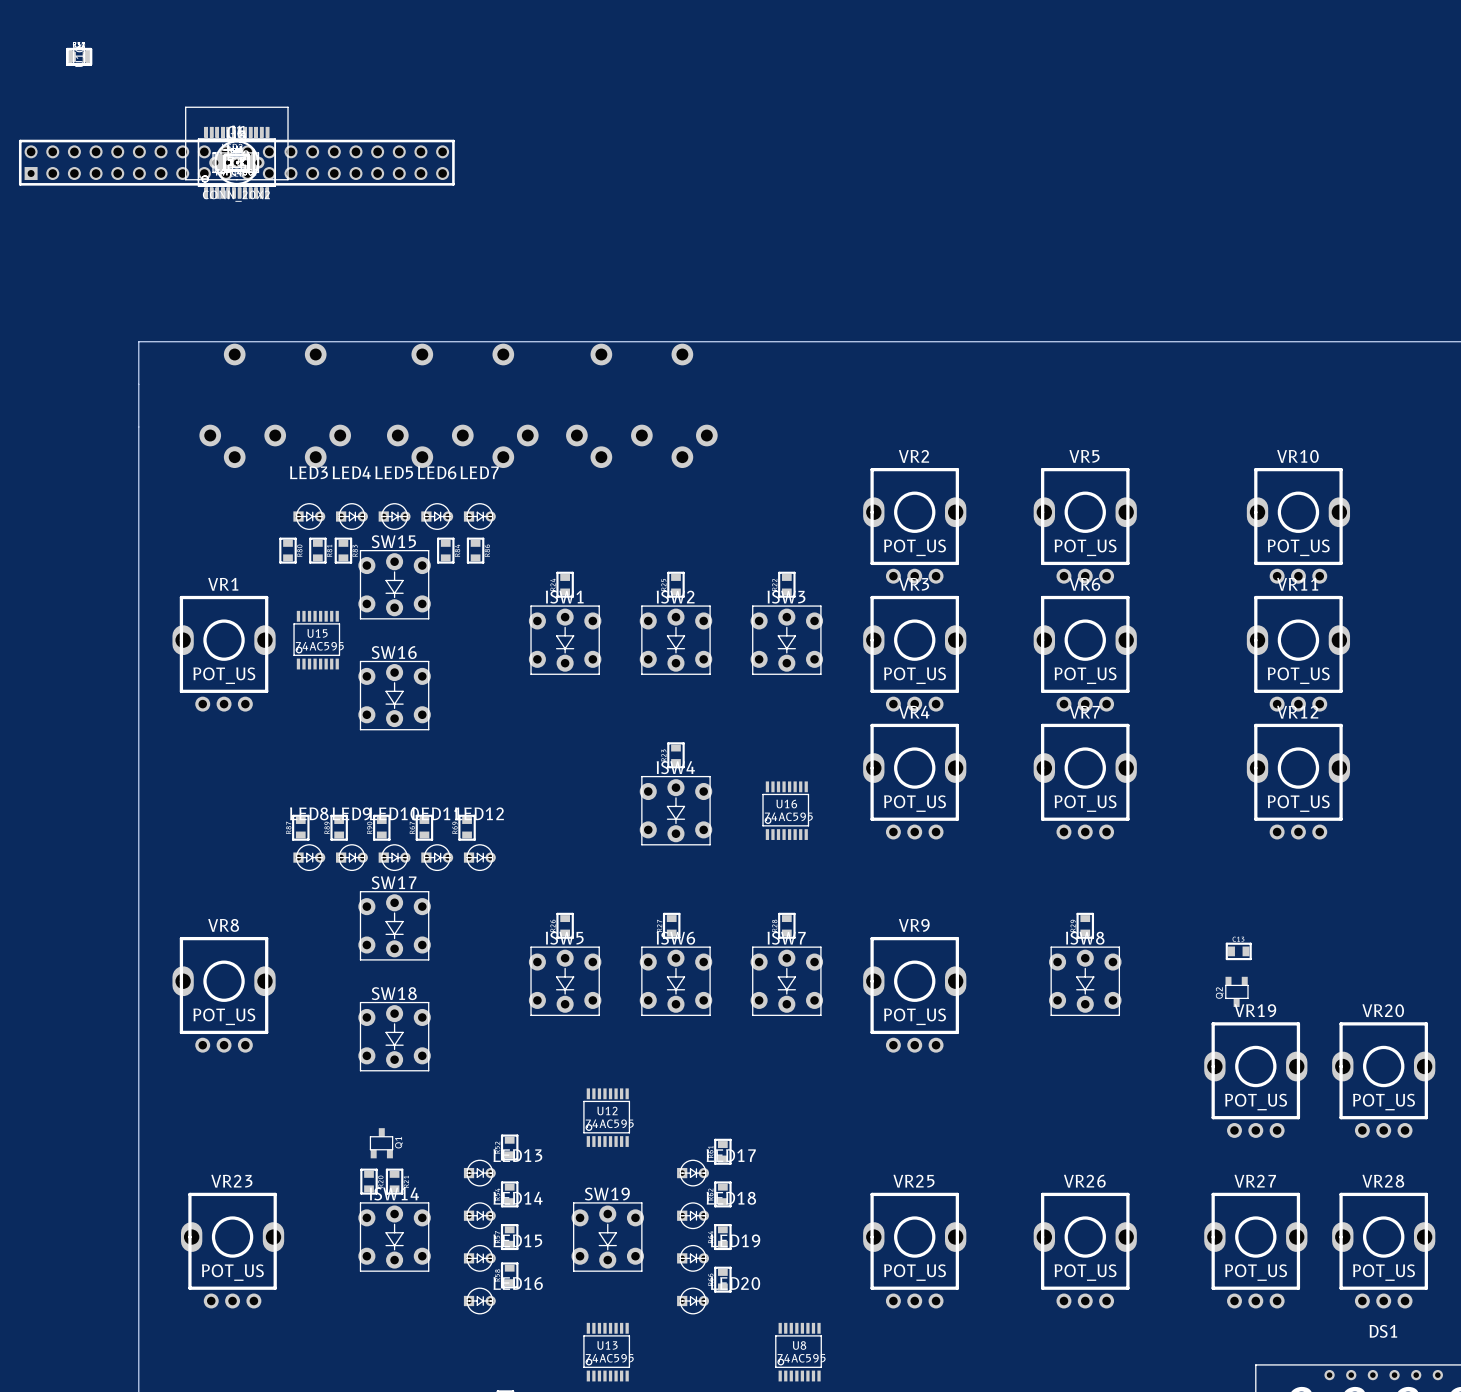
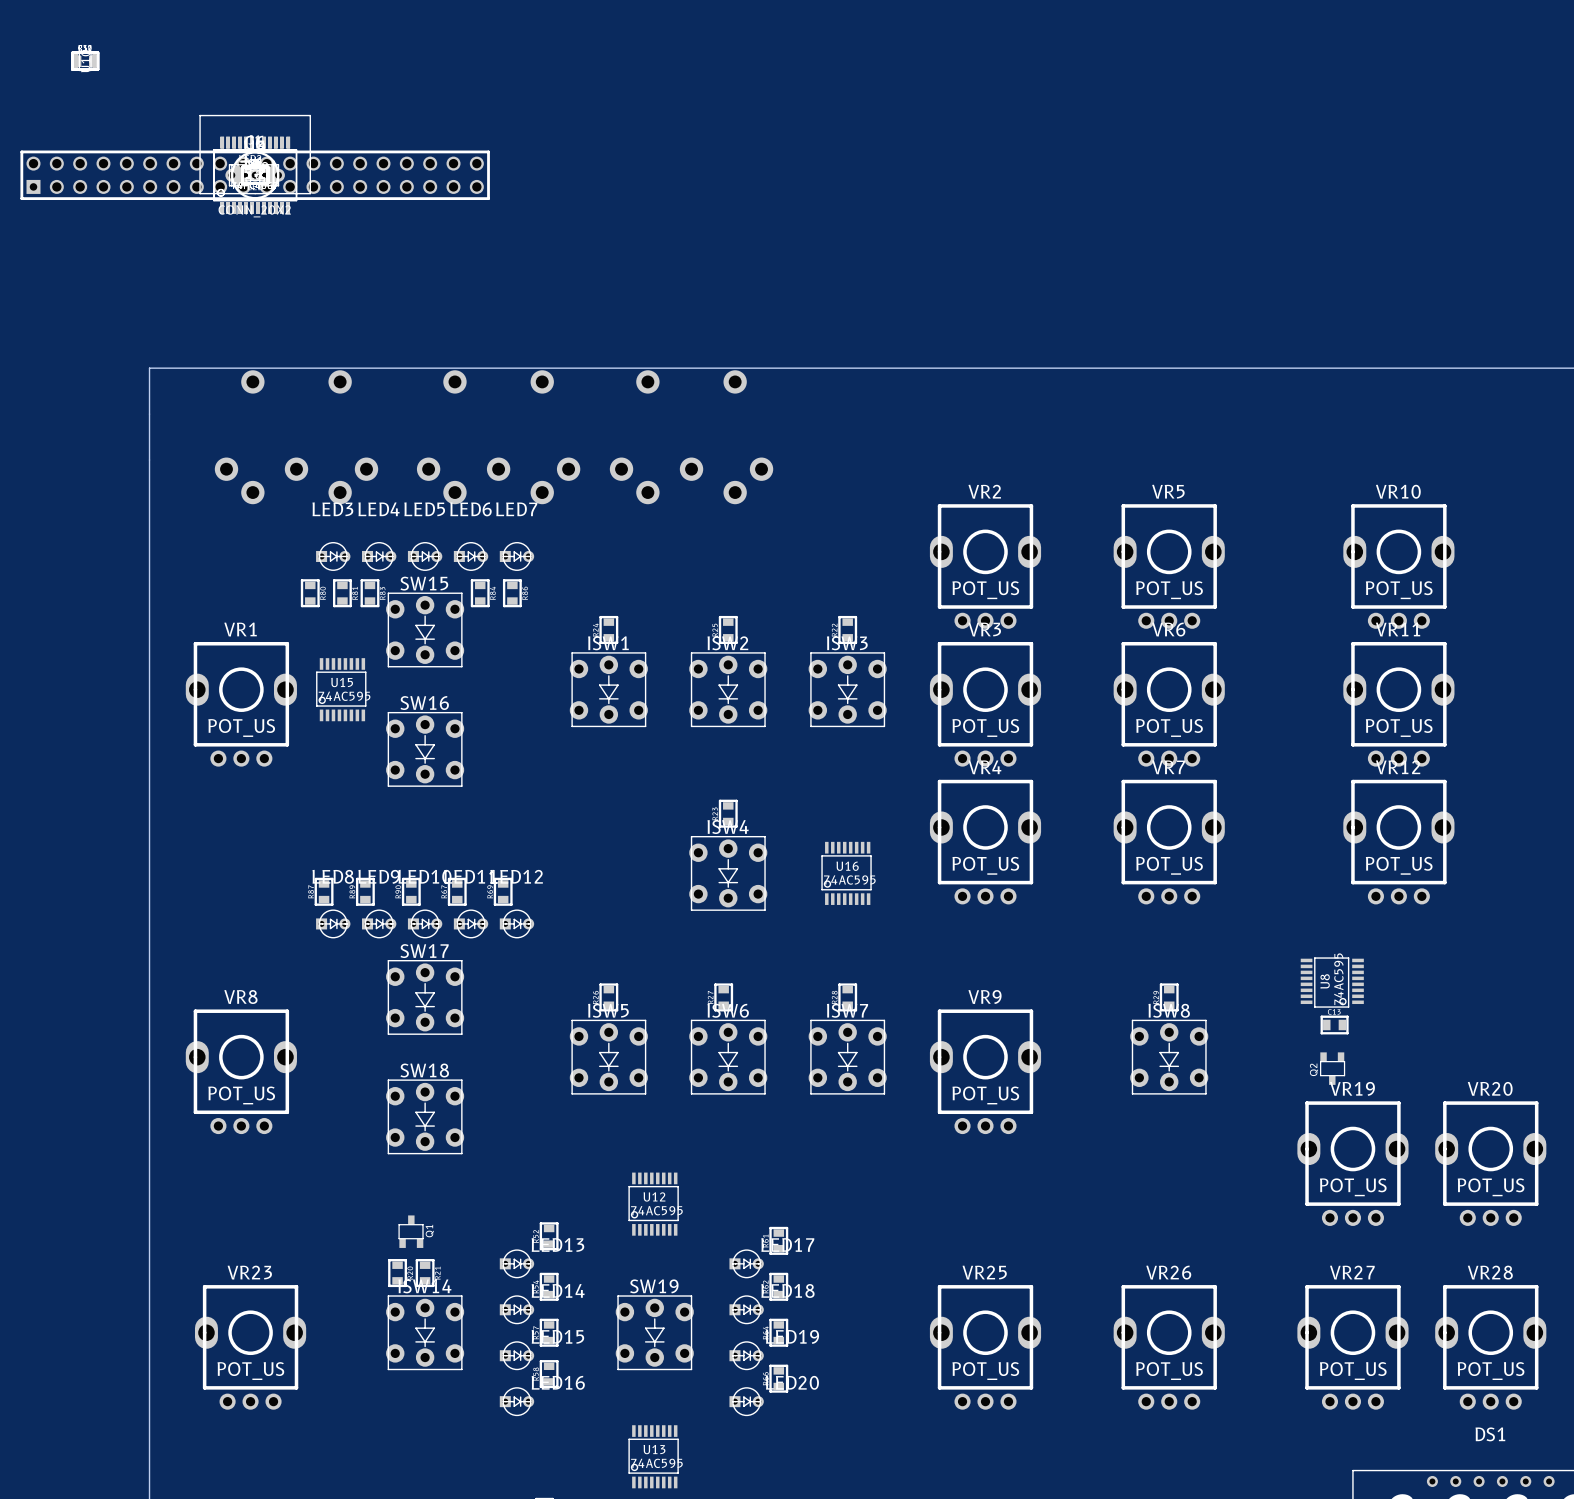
U8 rotation: 0° (798, 1352) -> 90° counterclockwise (1332, 982)
U8 position: (798, 1352) -> (1332, 982)

